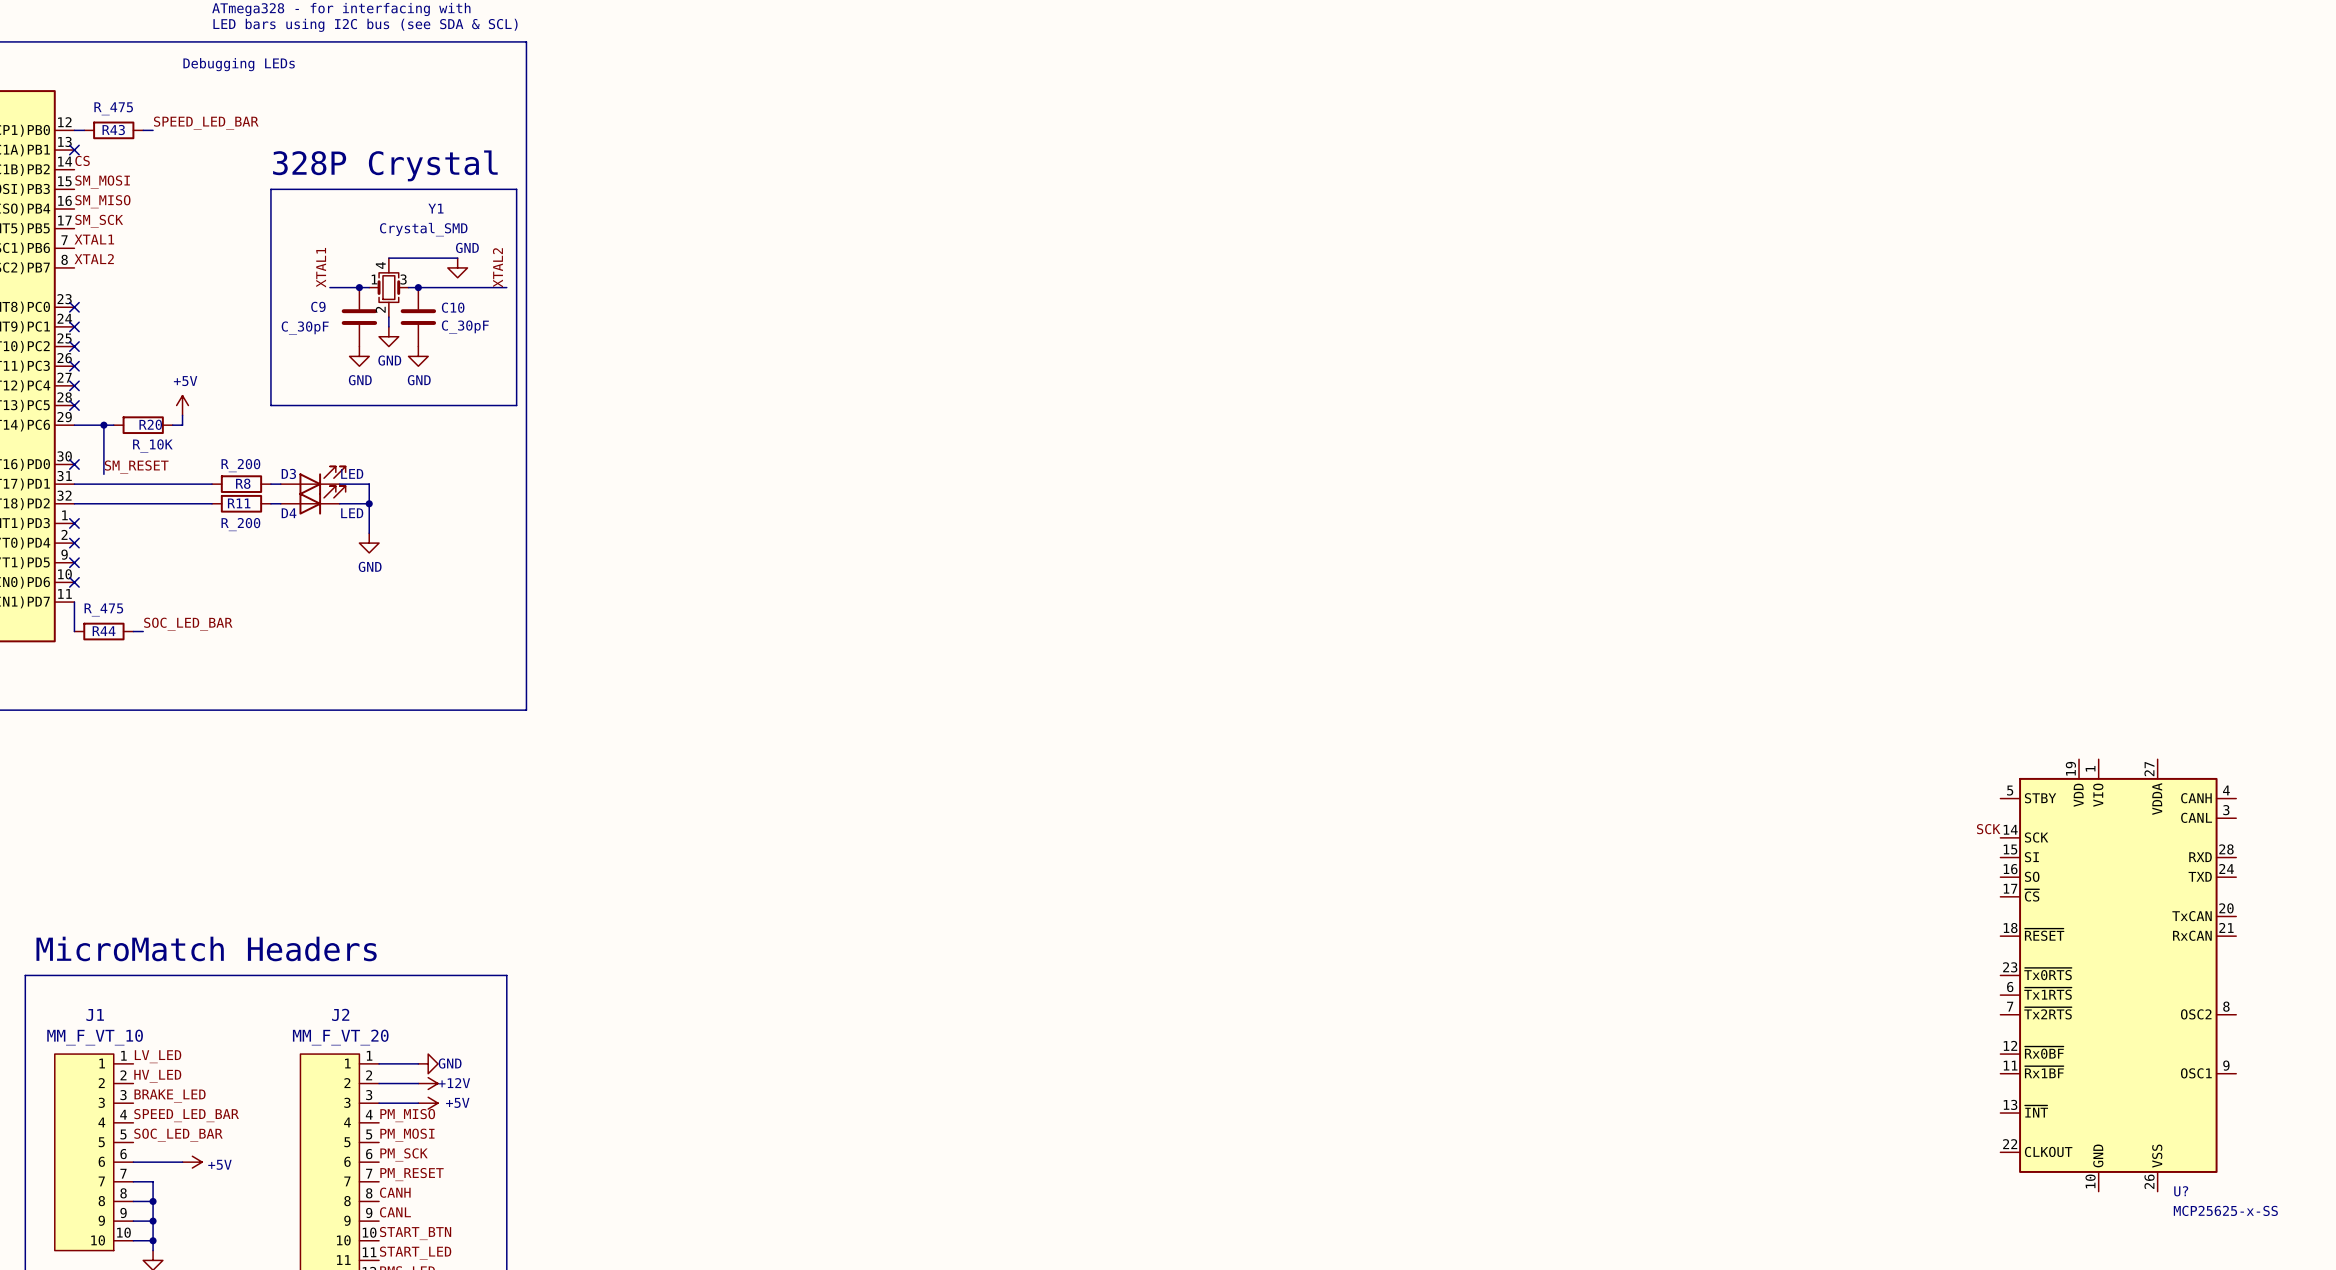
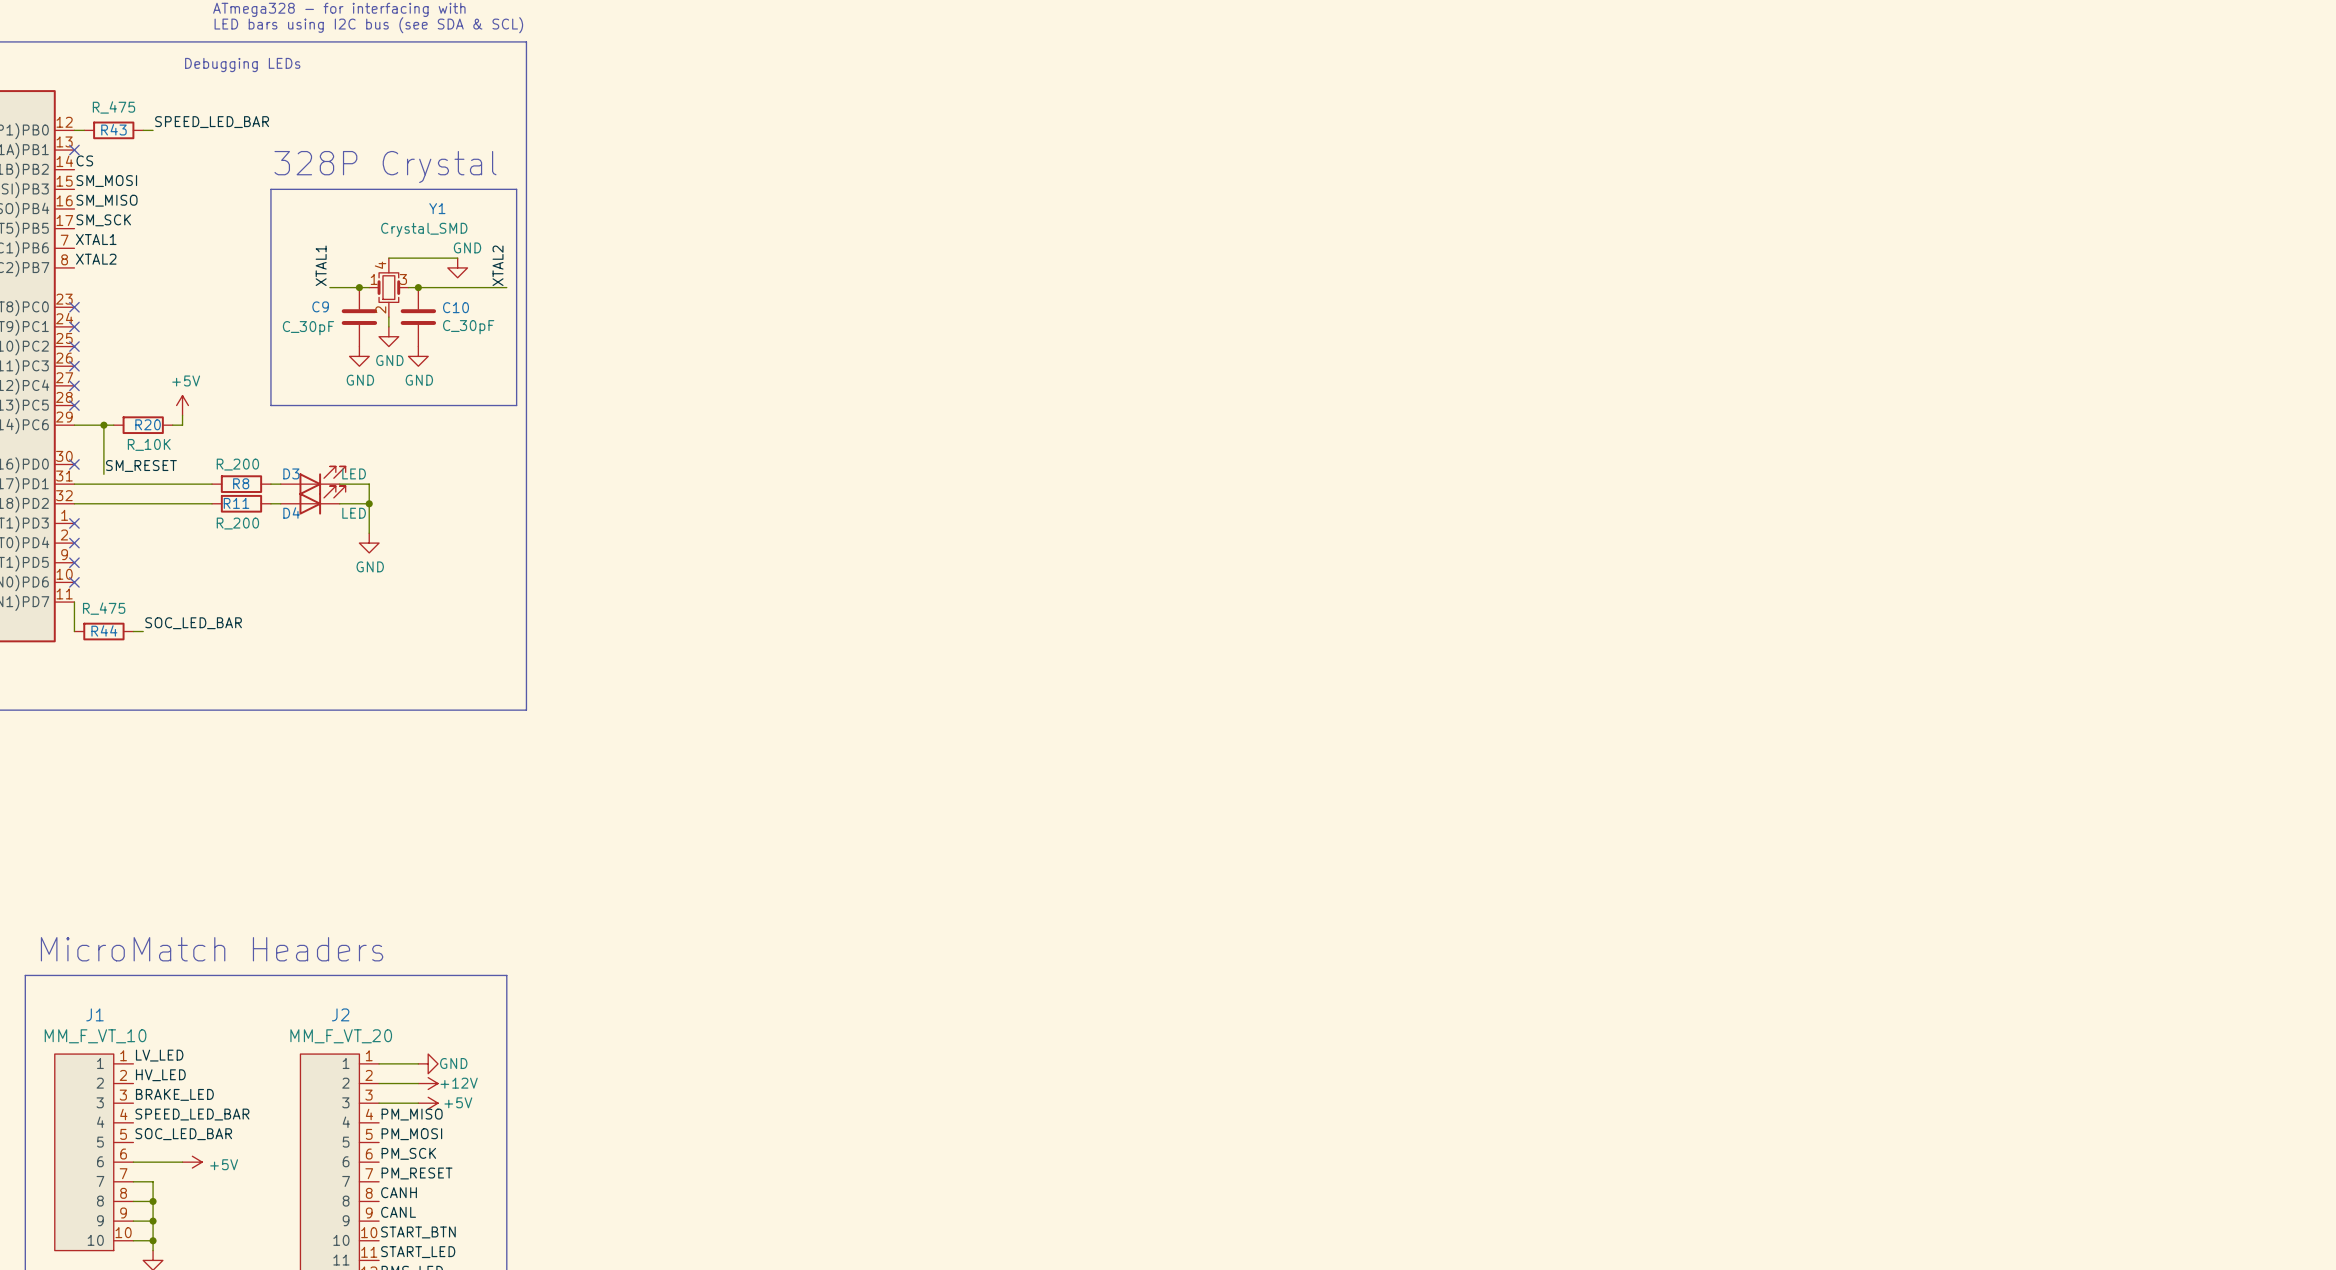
label: SCK (1988, 829) -> none
U?: MCP25625-x-SS (2118, 975) -> none

